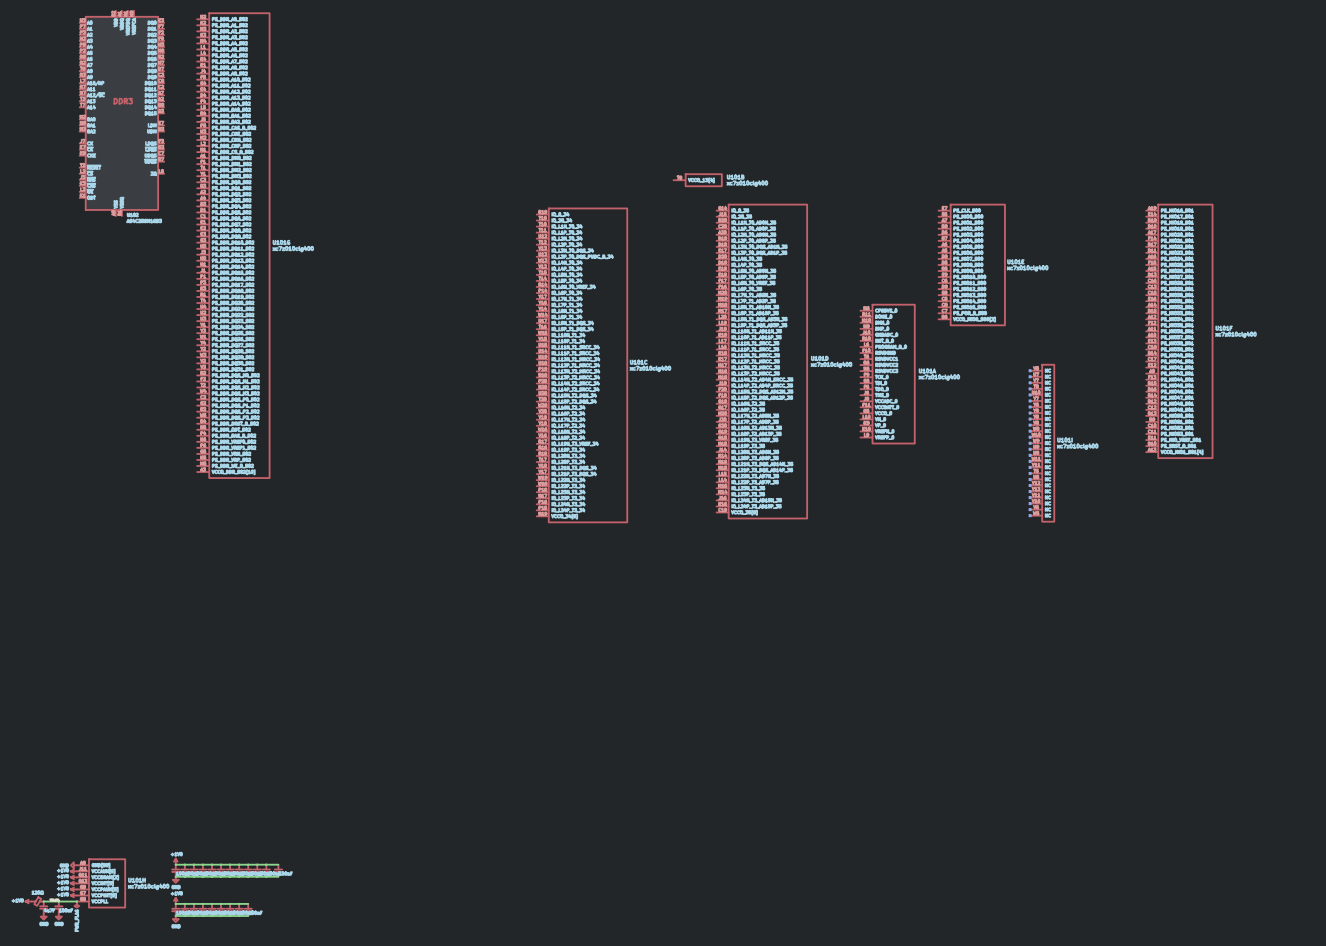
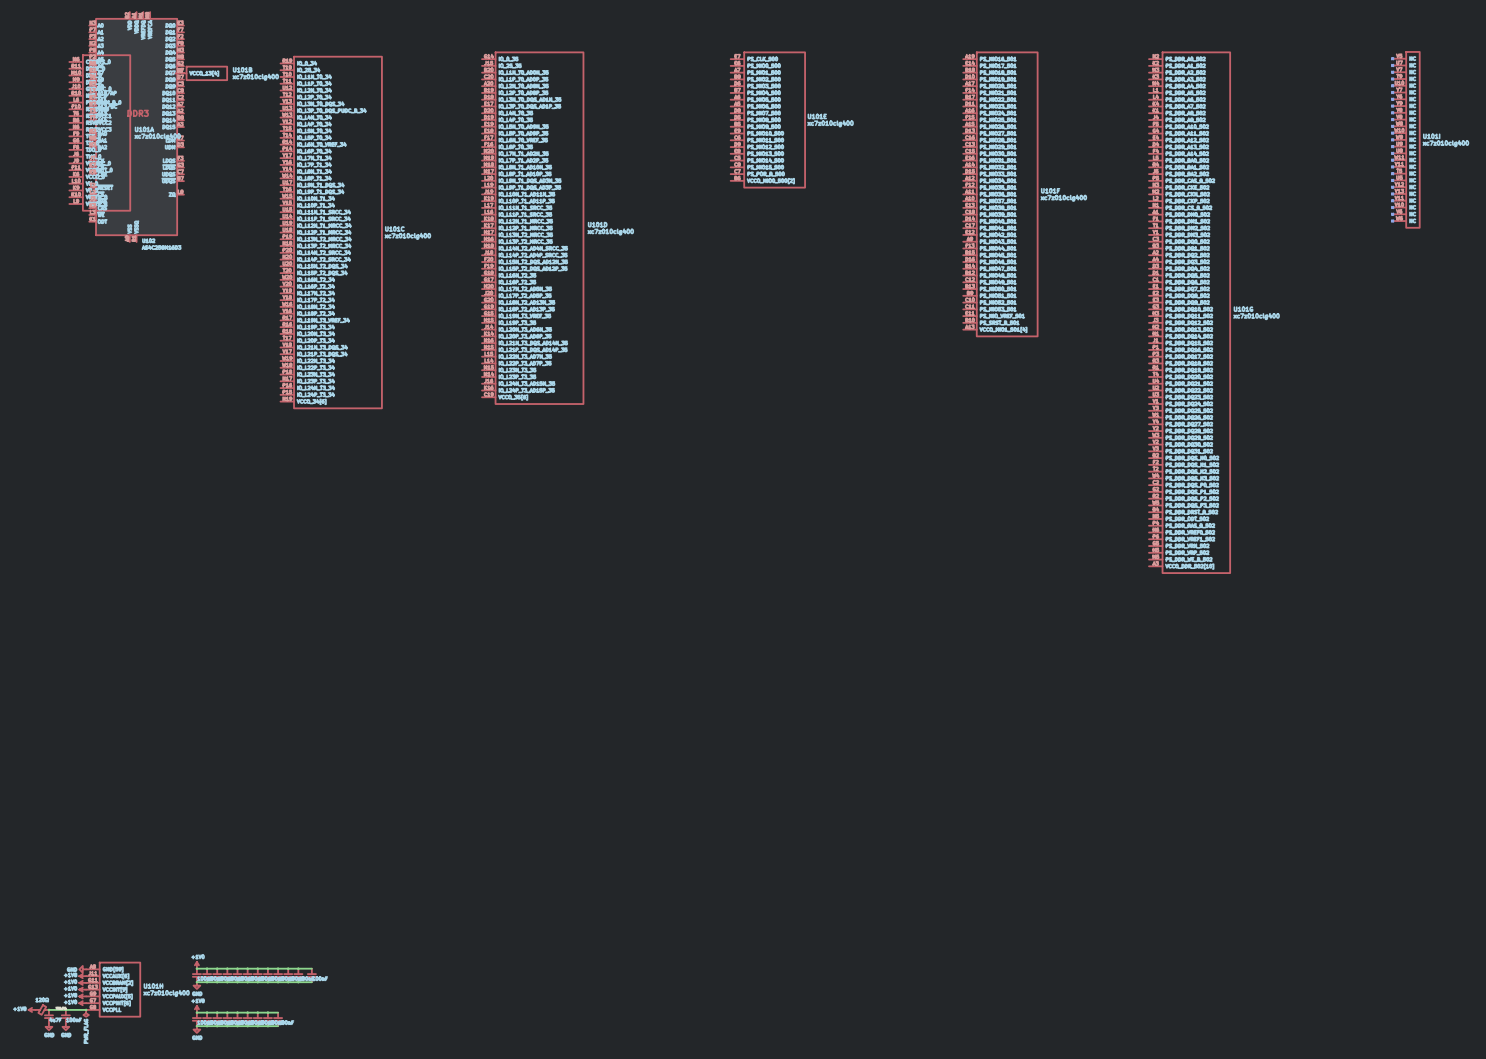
part position: (697, 180) -> (200, 73)
part position: (233, 245) -> (1189, 312)
part position: (971, 264) -> (768, 119)
part position: (1179, 331) -> (1000, 194)
part position: (762, 361) -> (532, 228)
part position: (582, 365) -> (331, 232)
part position: (887, 374) -> (100, 132)
part position: (1042, 443) -> (1405, 139)

